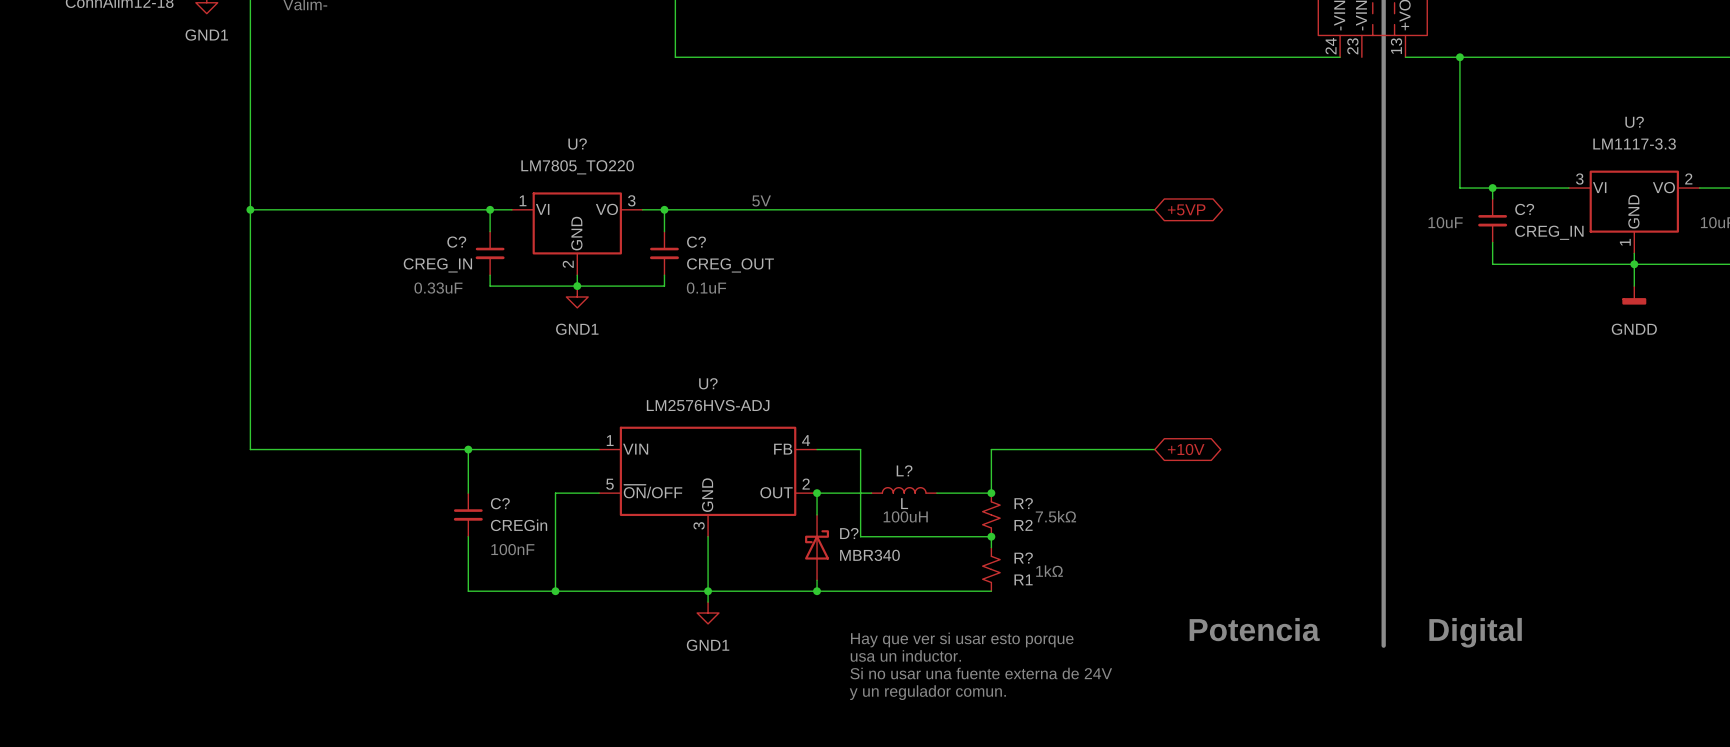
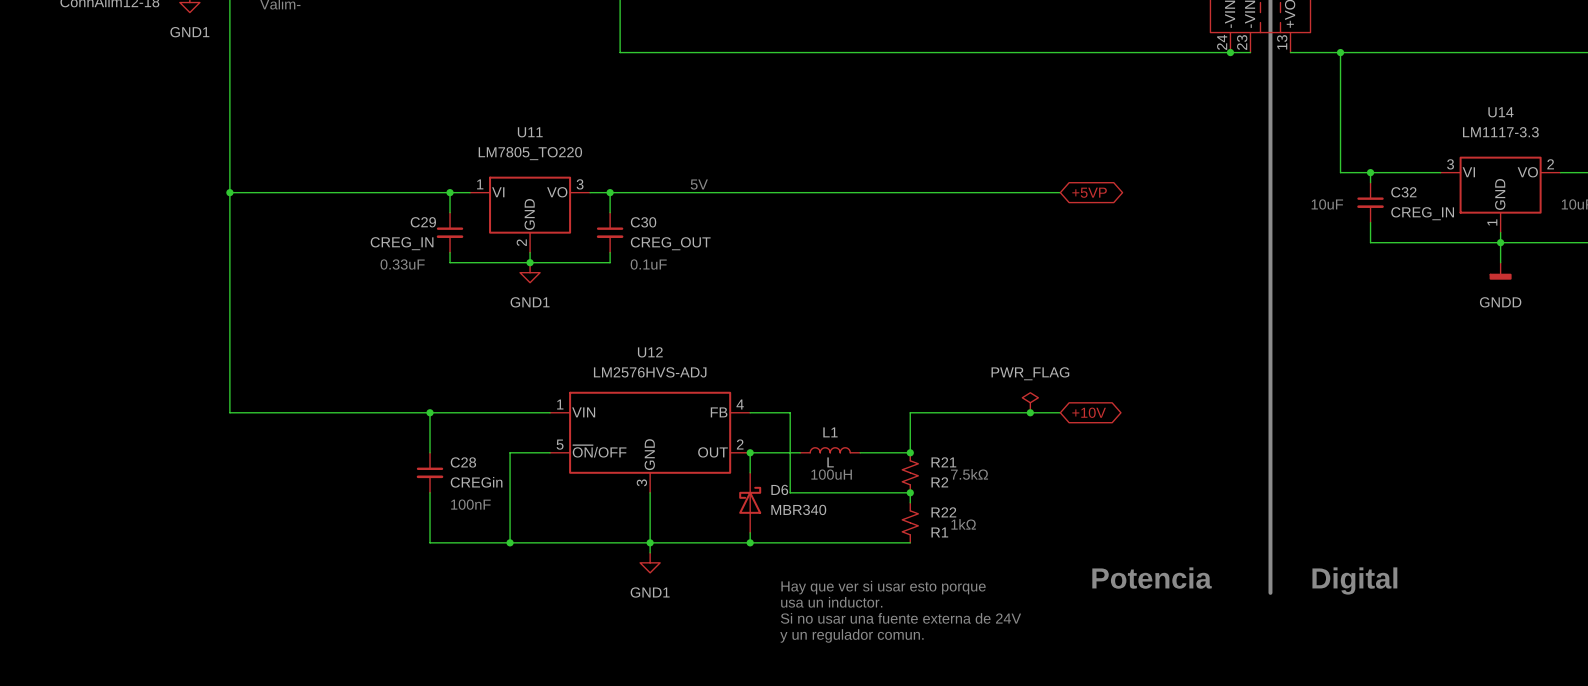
wire: none -> (1230, 52) (1250, 52)
junction: none -> (1230, 52)
U? name: U? (1634, 122) -> U14 (1500, 112)
U? name: U? (577, 144) -> U11 (530, 132)
C? name: C? (1524, 209) -> C32 (1403, 192)
C? name: C? (456, 242) -> C29 (423, 222)
C? name: C? (696, 242) -> C30 (643, 222)
U? name: U? (708, 383) -> U12 (650, 352)
power symbol: none -> PWR_FLAG (1030, 402)
junction: none -> (1030, 412)
L? name: L? (904, 470) -> L1 (830, 432)
C? name: C? (500, 503) -> C28 (463, 462)
R? name: R? (1023, 503) -> R21 (943, 462)
D? name: D? (849, 533) -> D6 (779, 489)
R? name: R? (1023, 558) -> R22 (943, 512)

